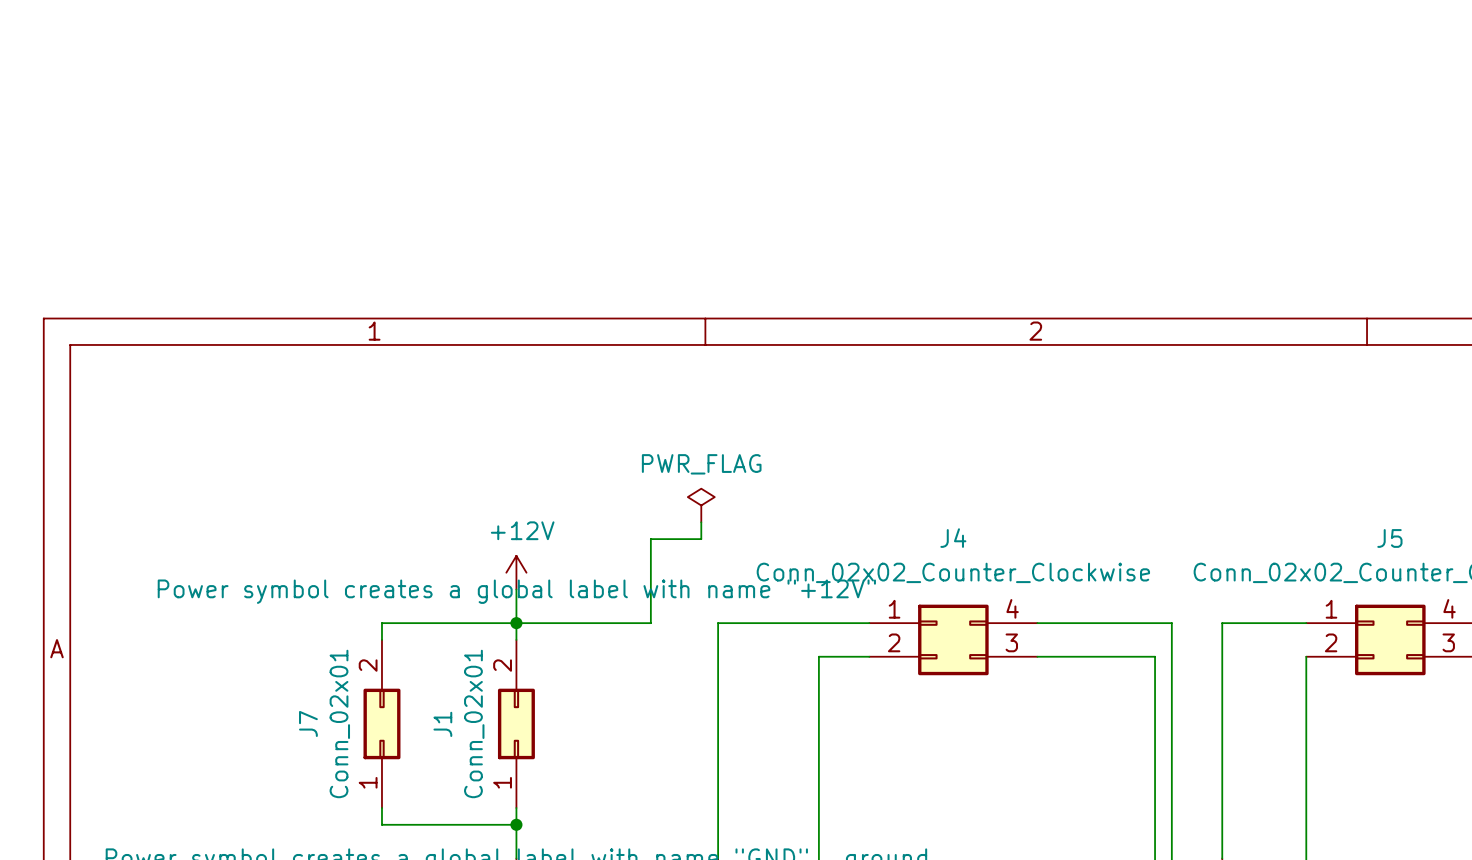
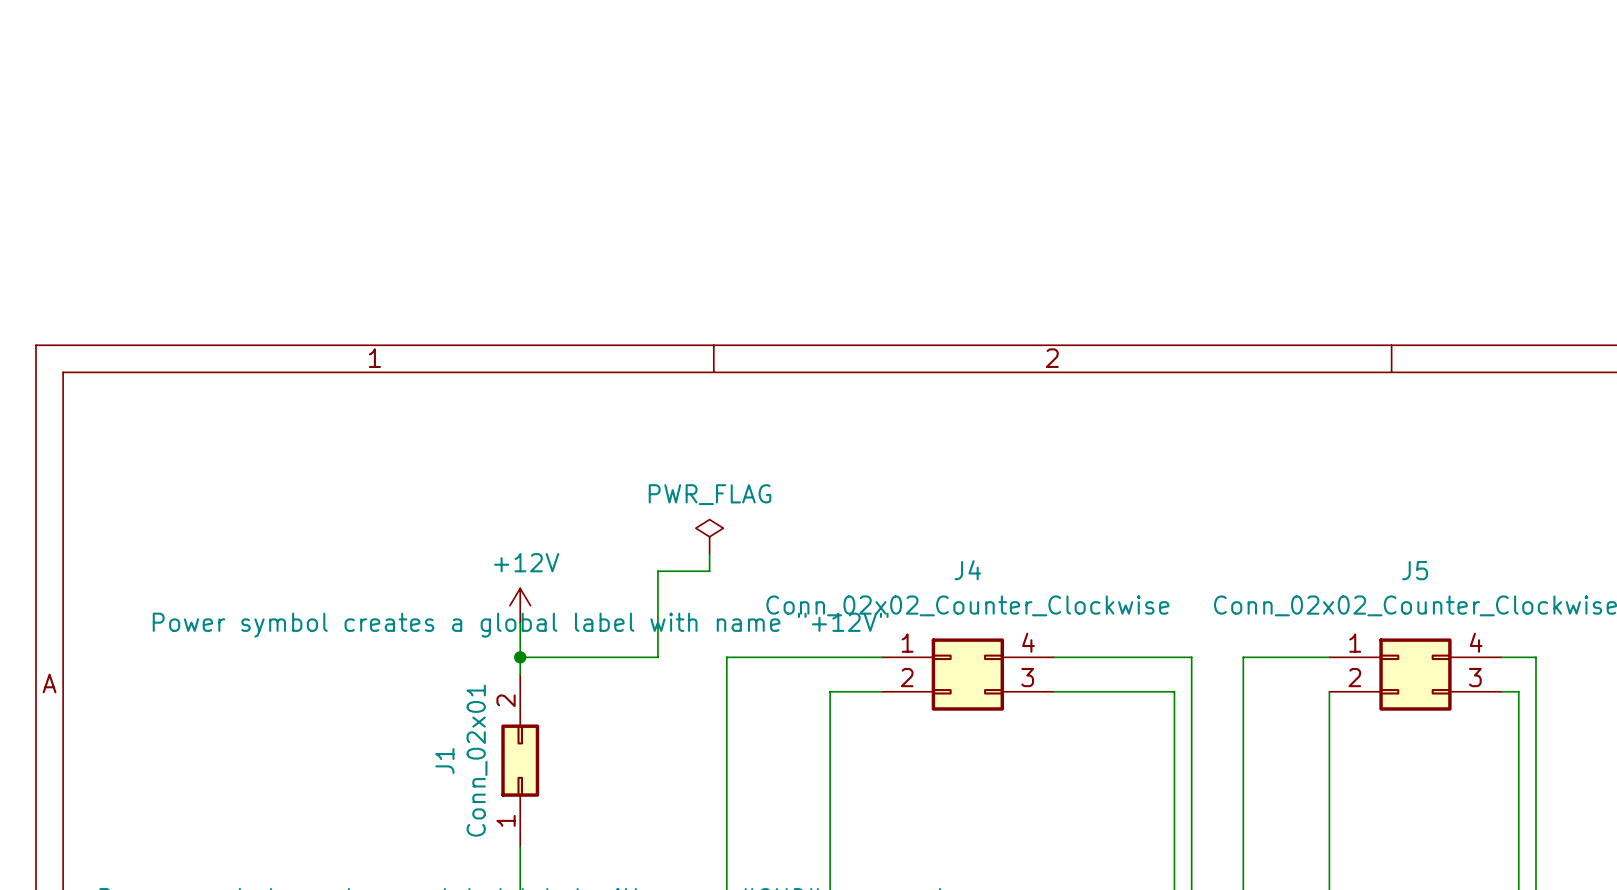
wire: (516, 623) (381, 623) (381, 639) -> none
J7: Conn_02x01 (381, 723) -> none
wire: (381, 807) (381, 824) (516, 824) -> none
junction: (516, 824) -> none

